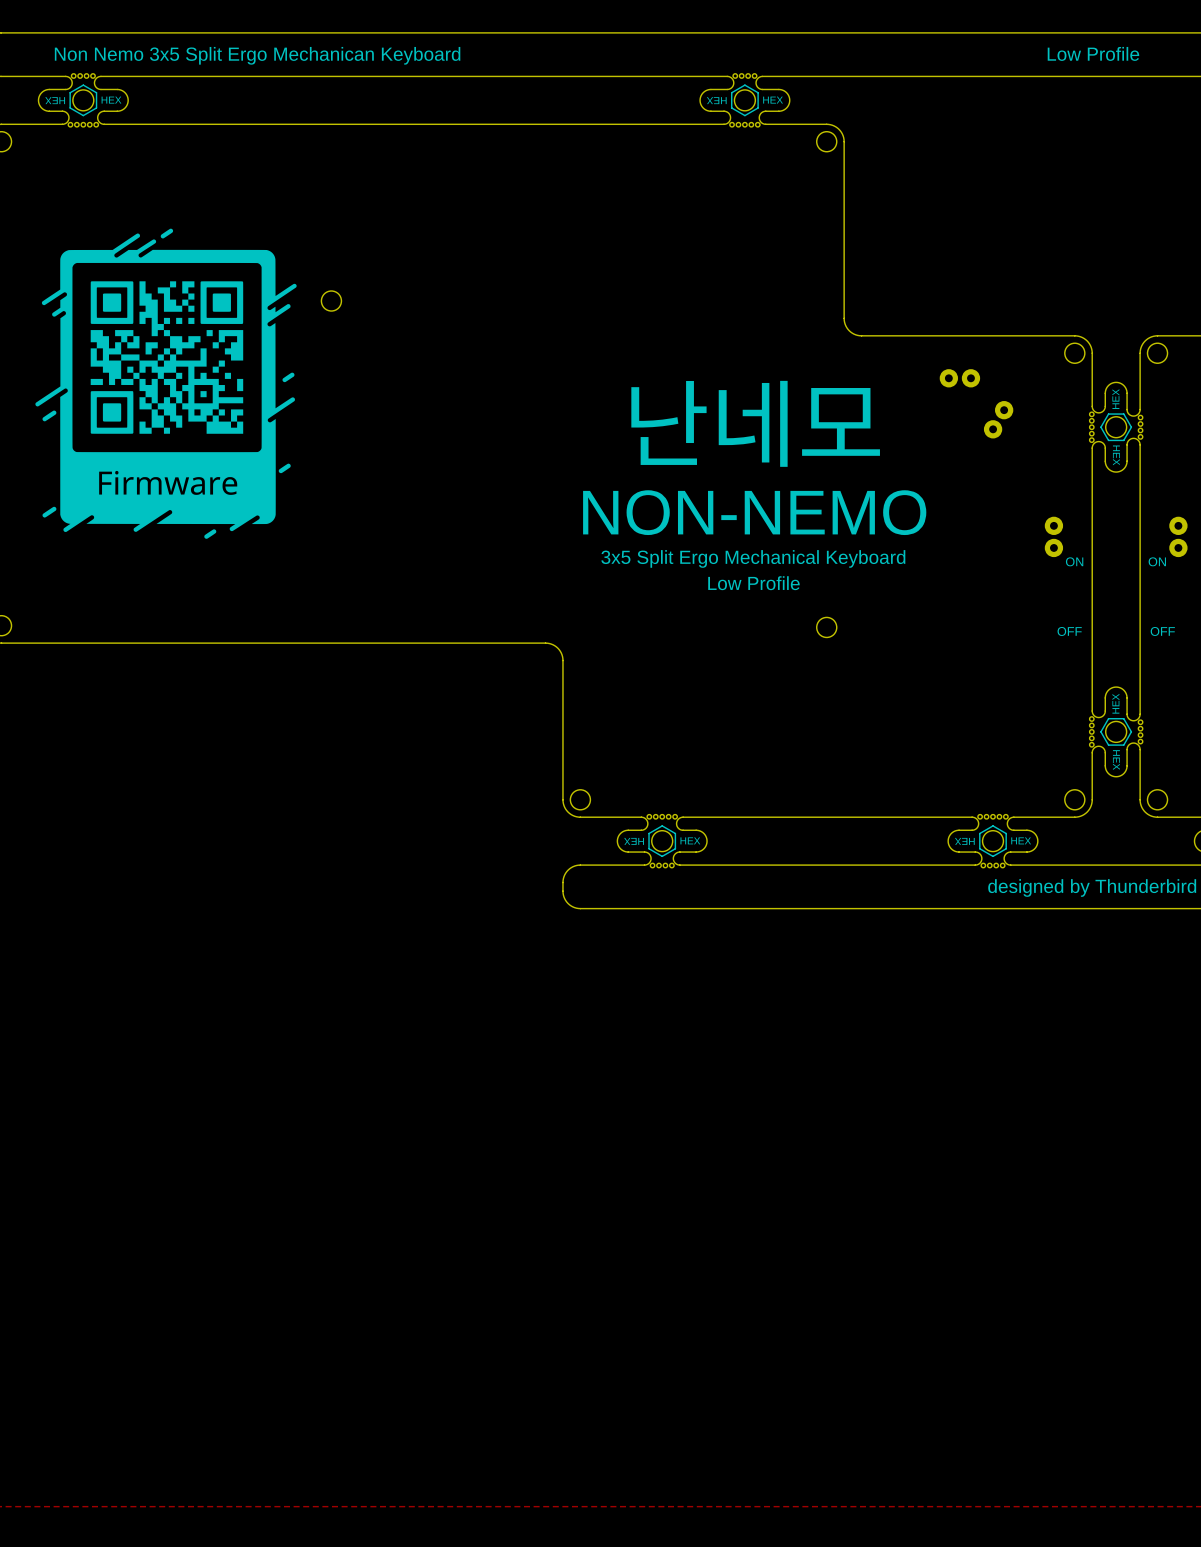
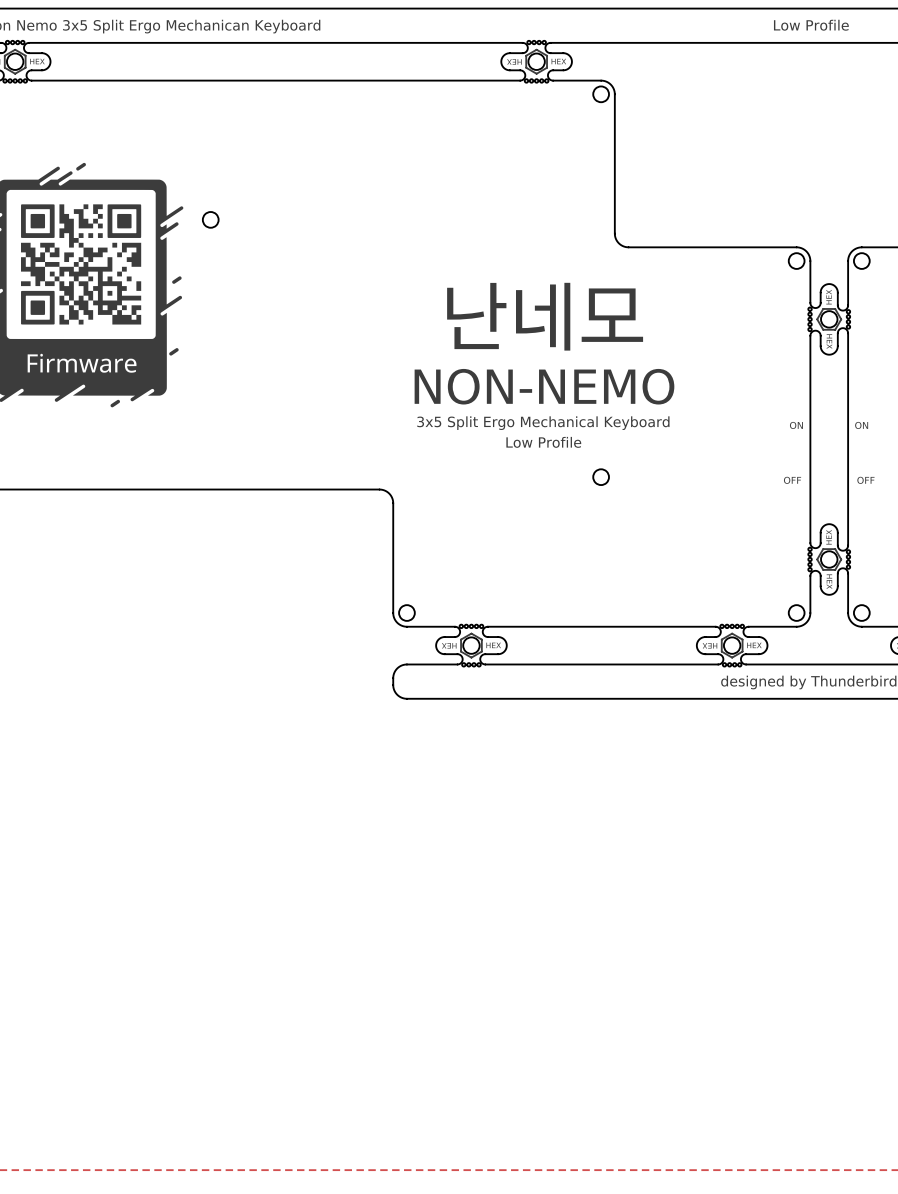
part: (959, 378) -> none
part: (998, 419) -> none
part: (1053, 536) -> none
part: (1178, 536) -> none

